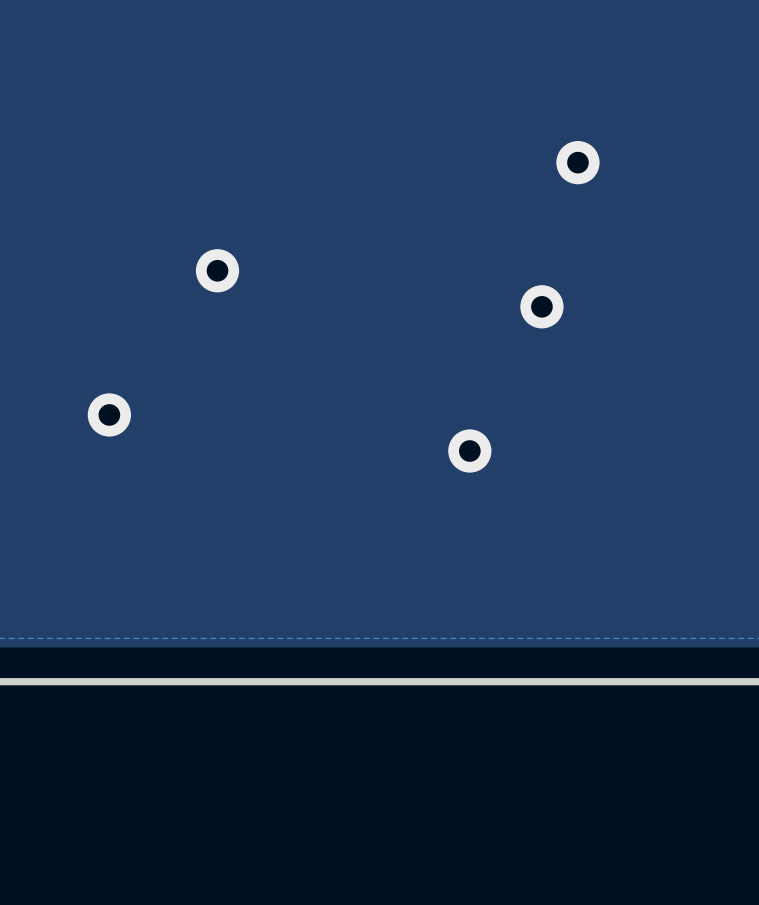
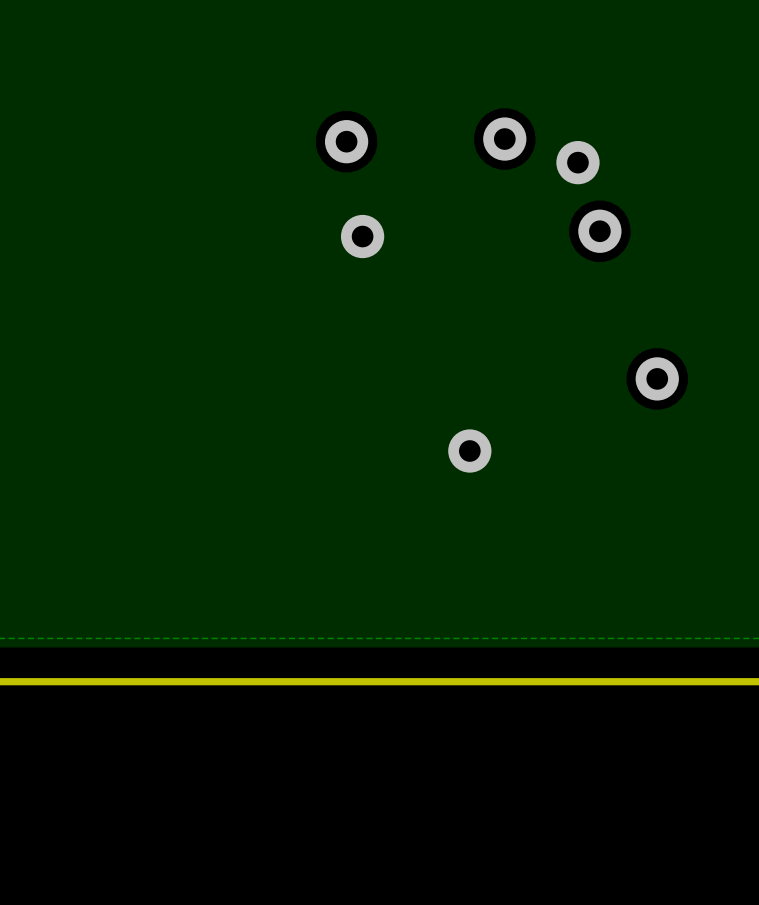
via: none -> (504, 139)
via: none -> (346, 141)
via: none -> (599, 231)
via: none -> (362, 236)
via: (217, 270) -> none
via: (541, 306) -> none
via: none -> (657, 378)
via: (109, 414) -> none

